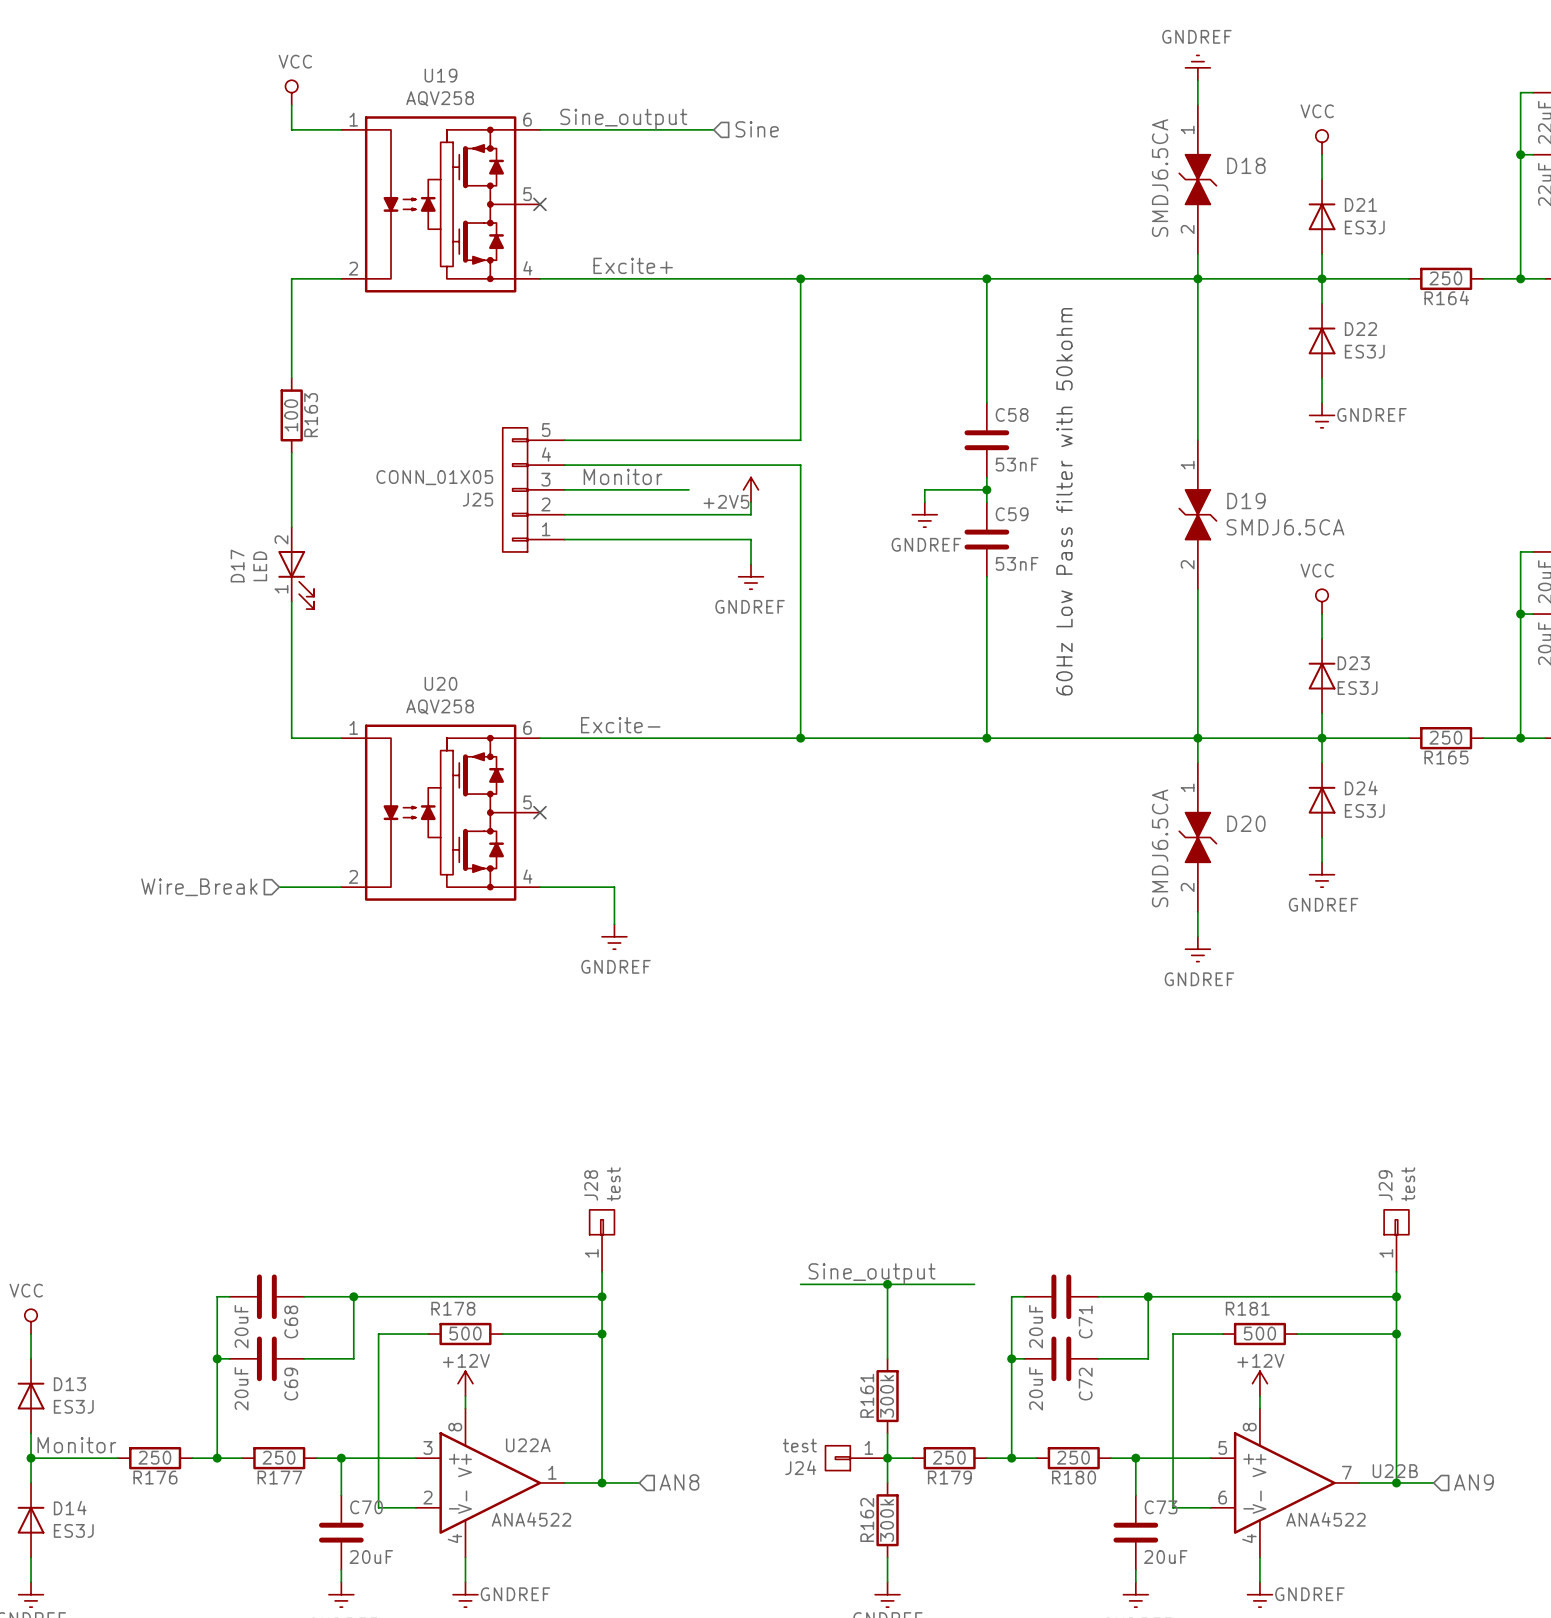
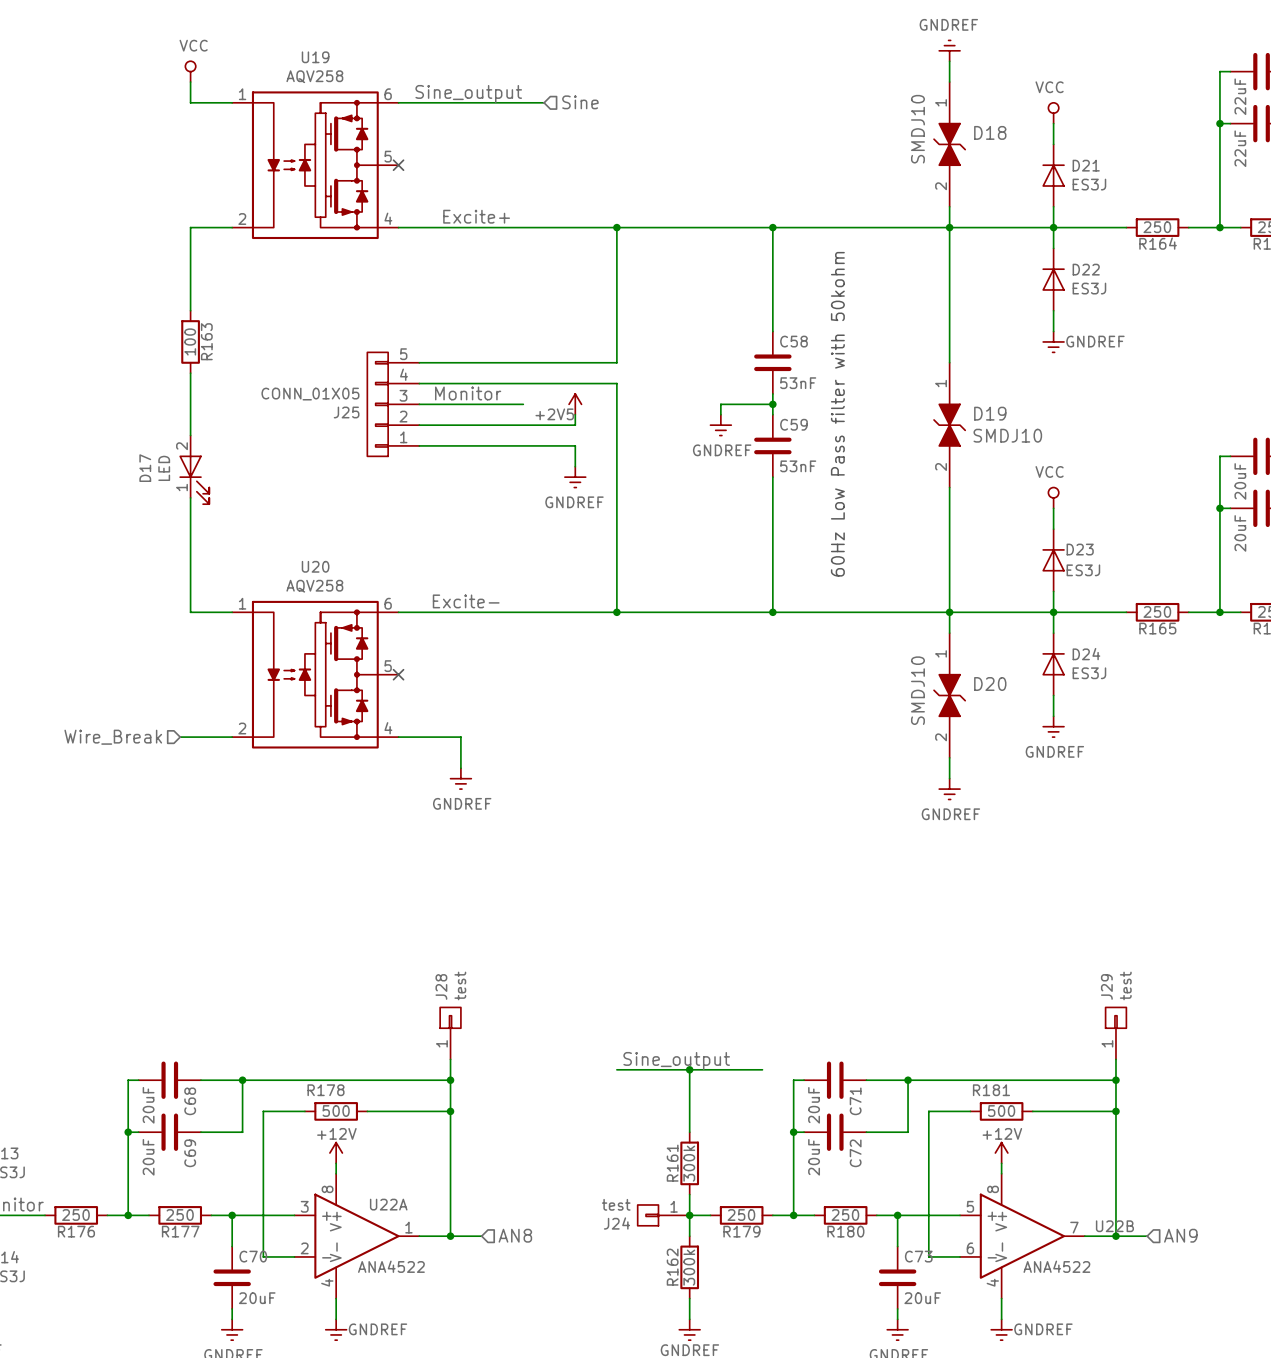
D18 value: SMDJ6.5CA (1160, 178) -> SMDJ10 (917, 129)
D19 value: SMDJ6.5CA (1285, 527) -> SMDJ10 (1007, 435)
D20 value: SMDJ6.5CA (1160, 848) -> SMDJ10 (917, 690)

